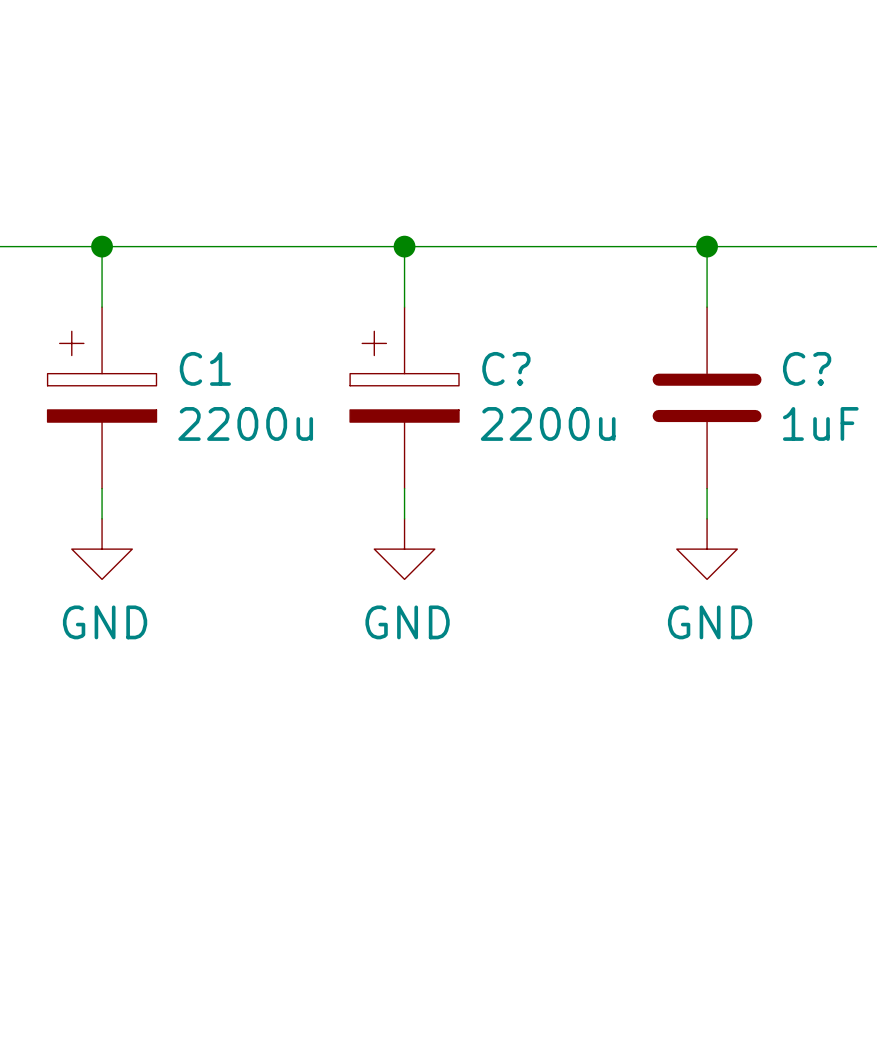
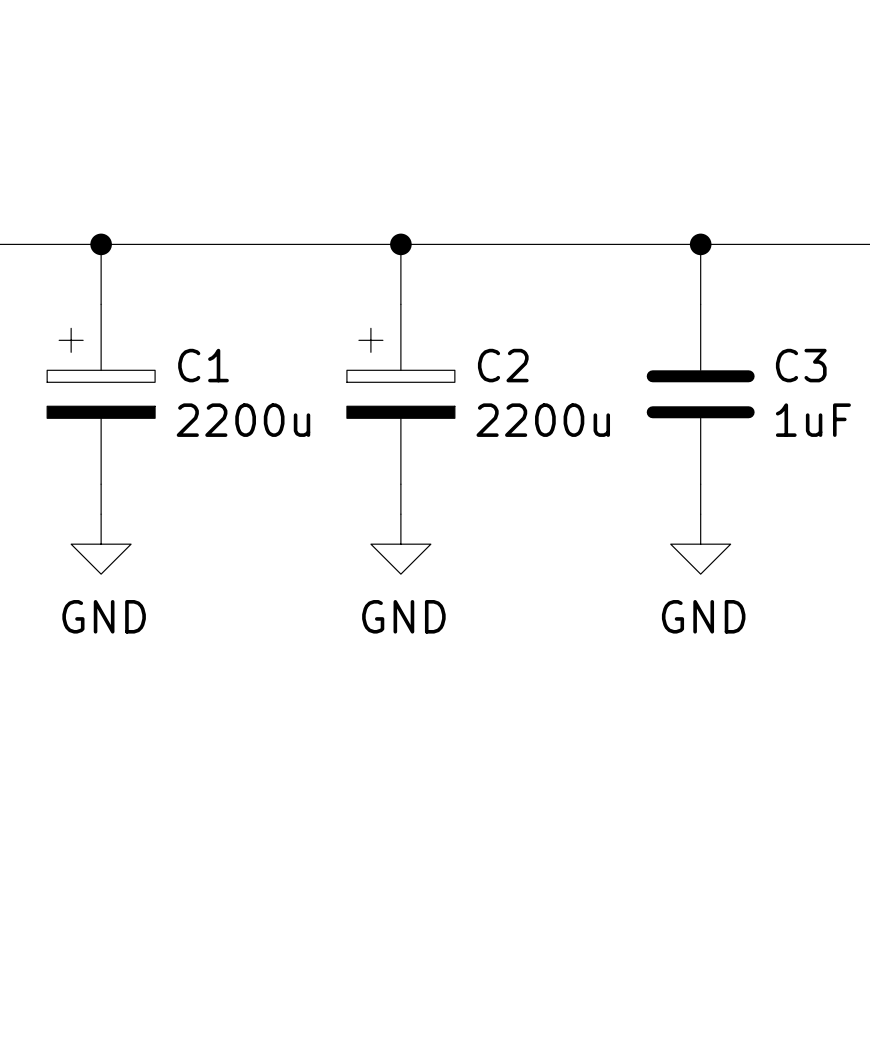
C? name: C? (506, 368) -> C2 (503, 365)
C? name: C? (807, 368) -> C3 (801, 365)

